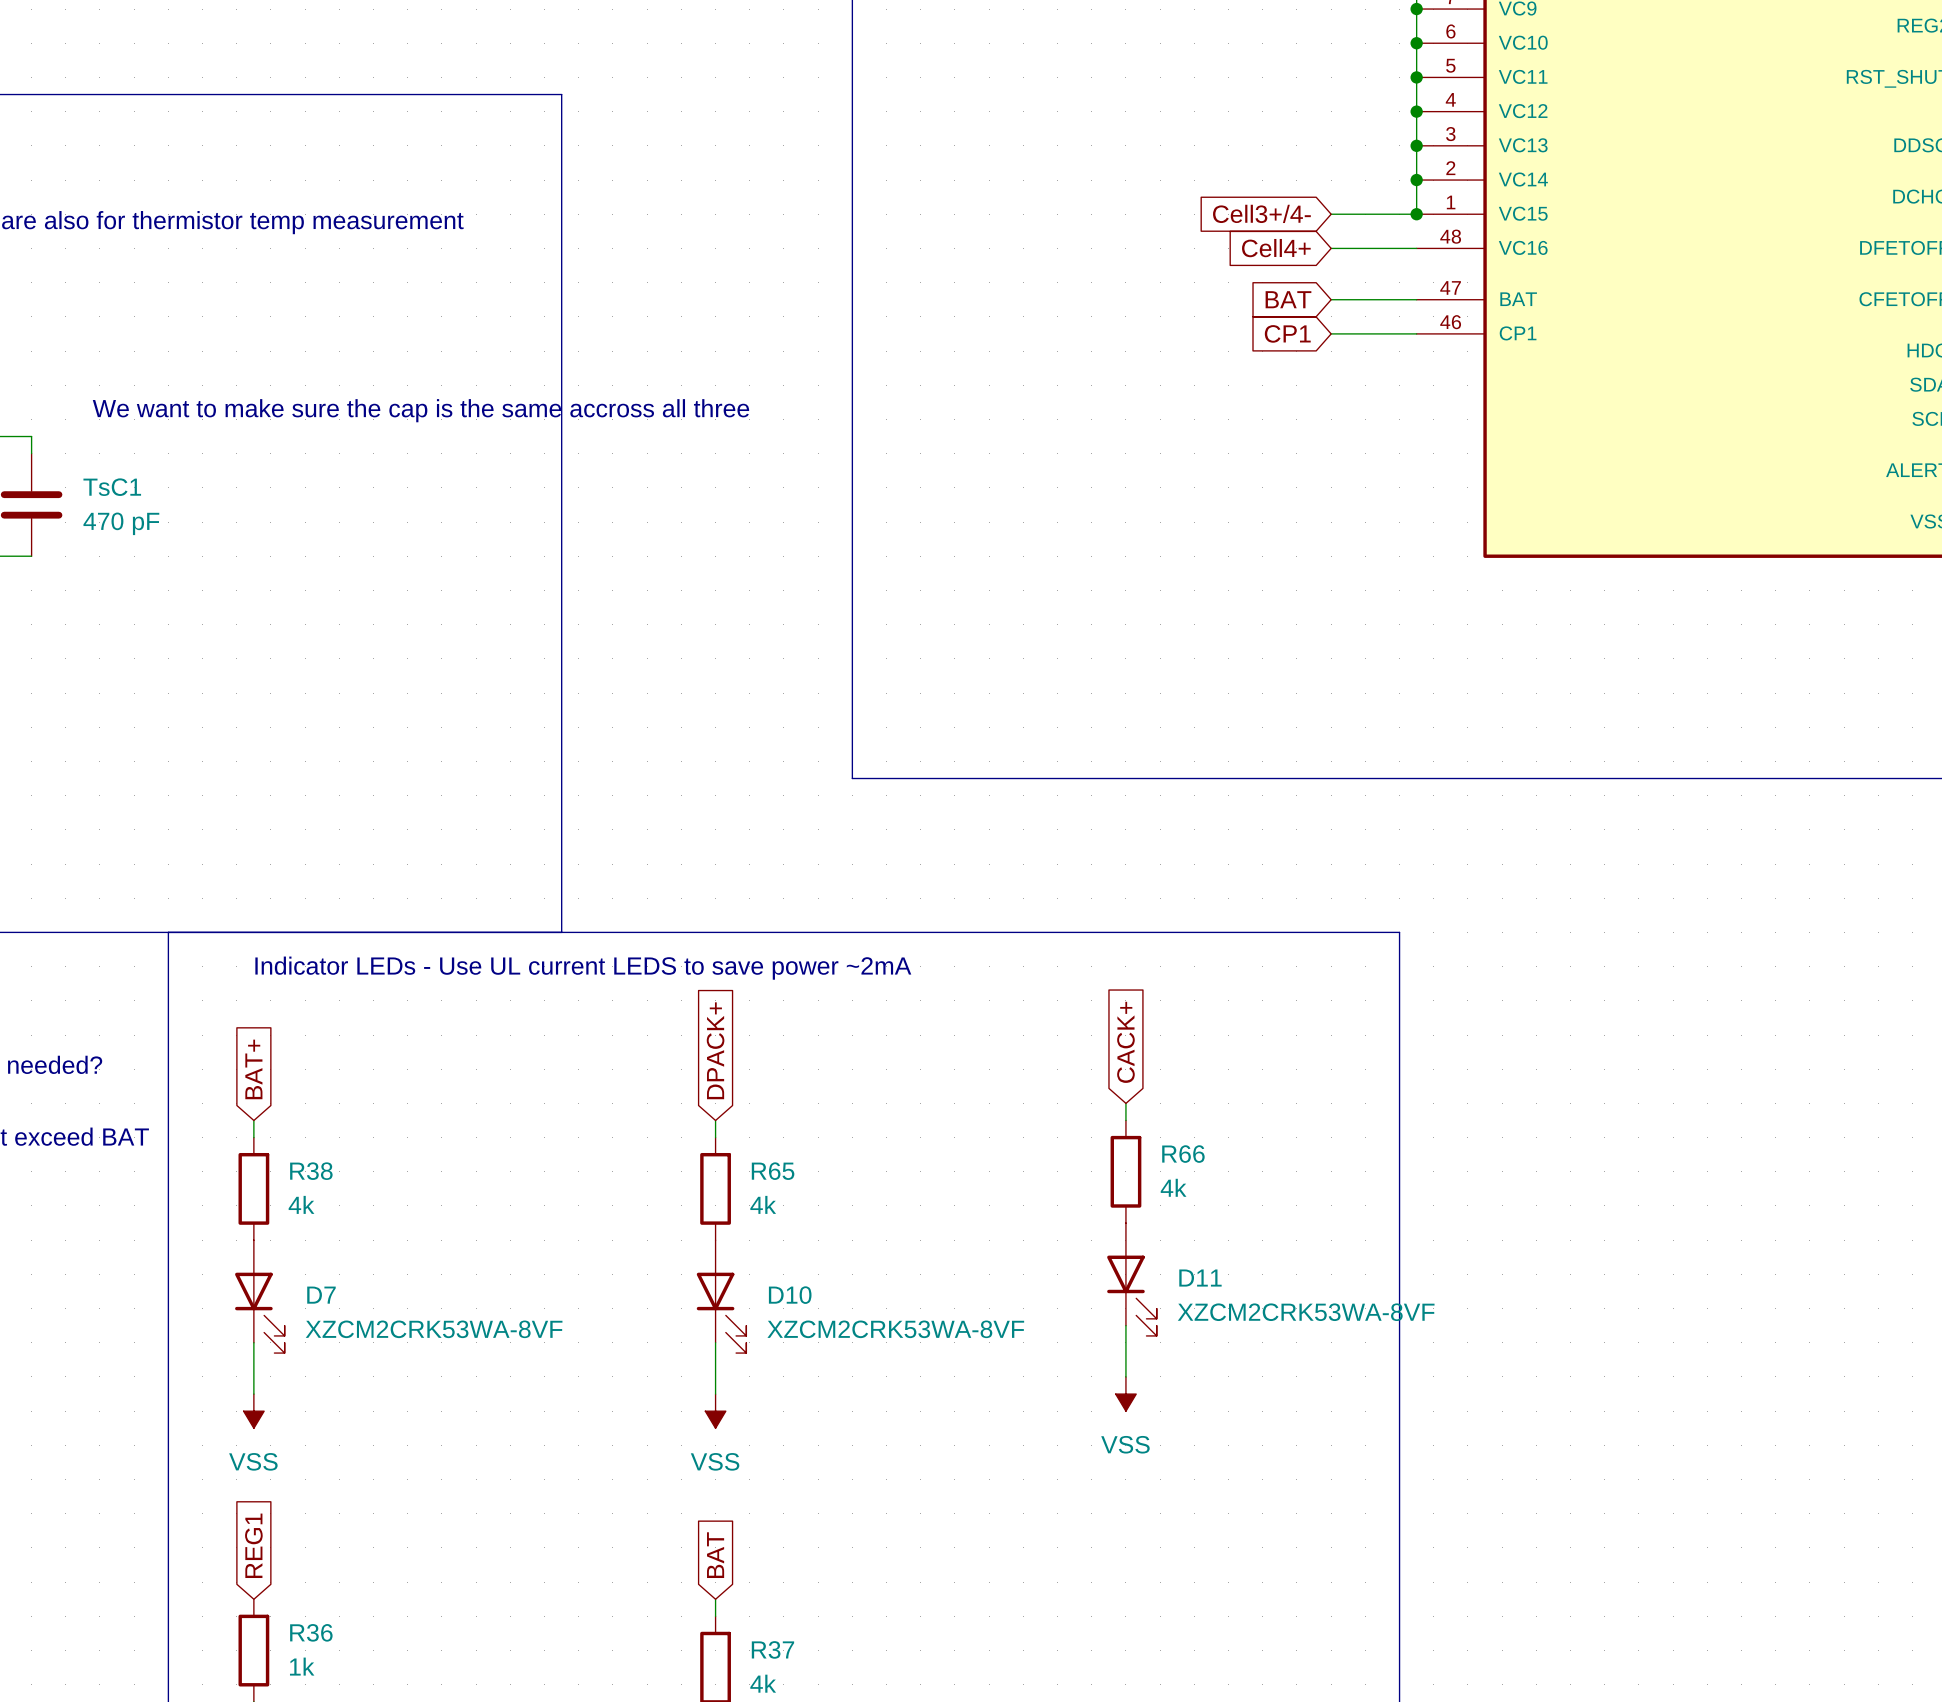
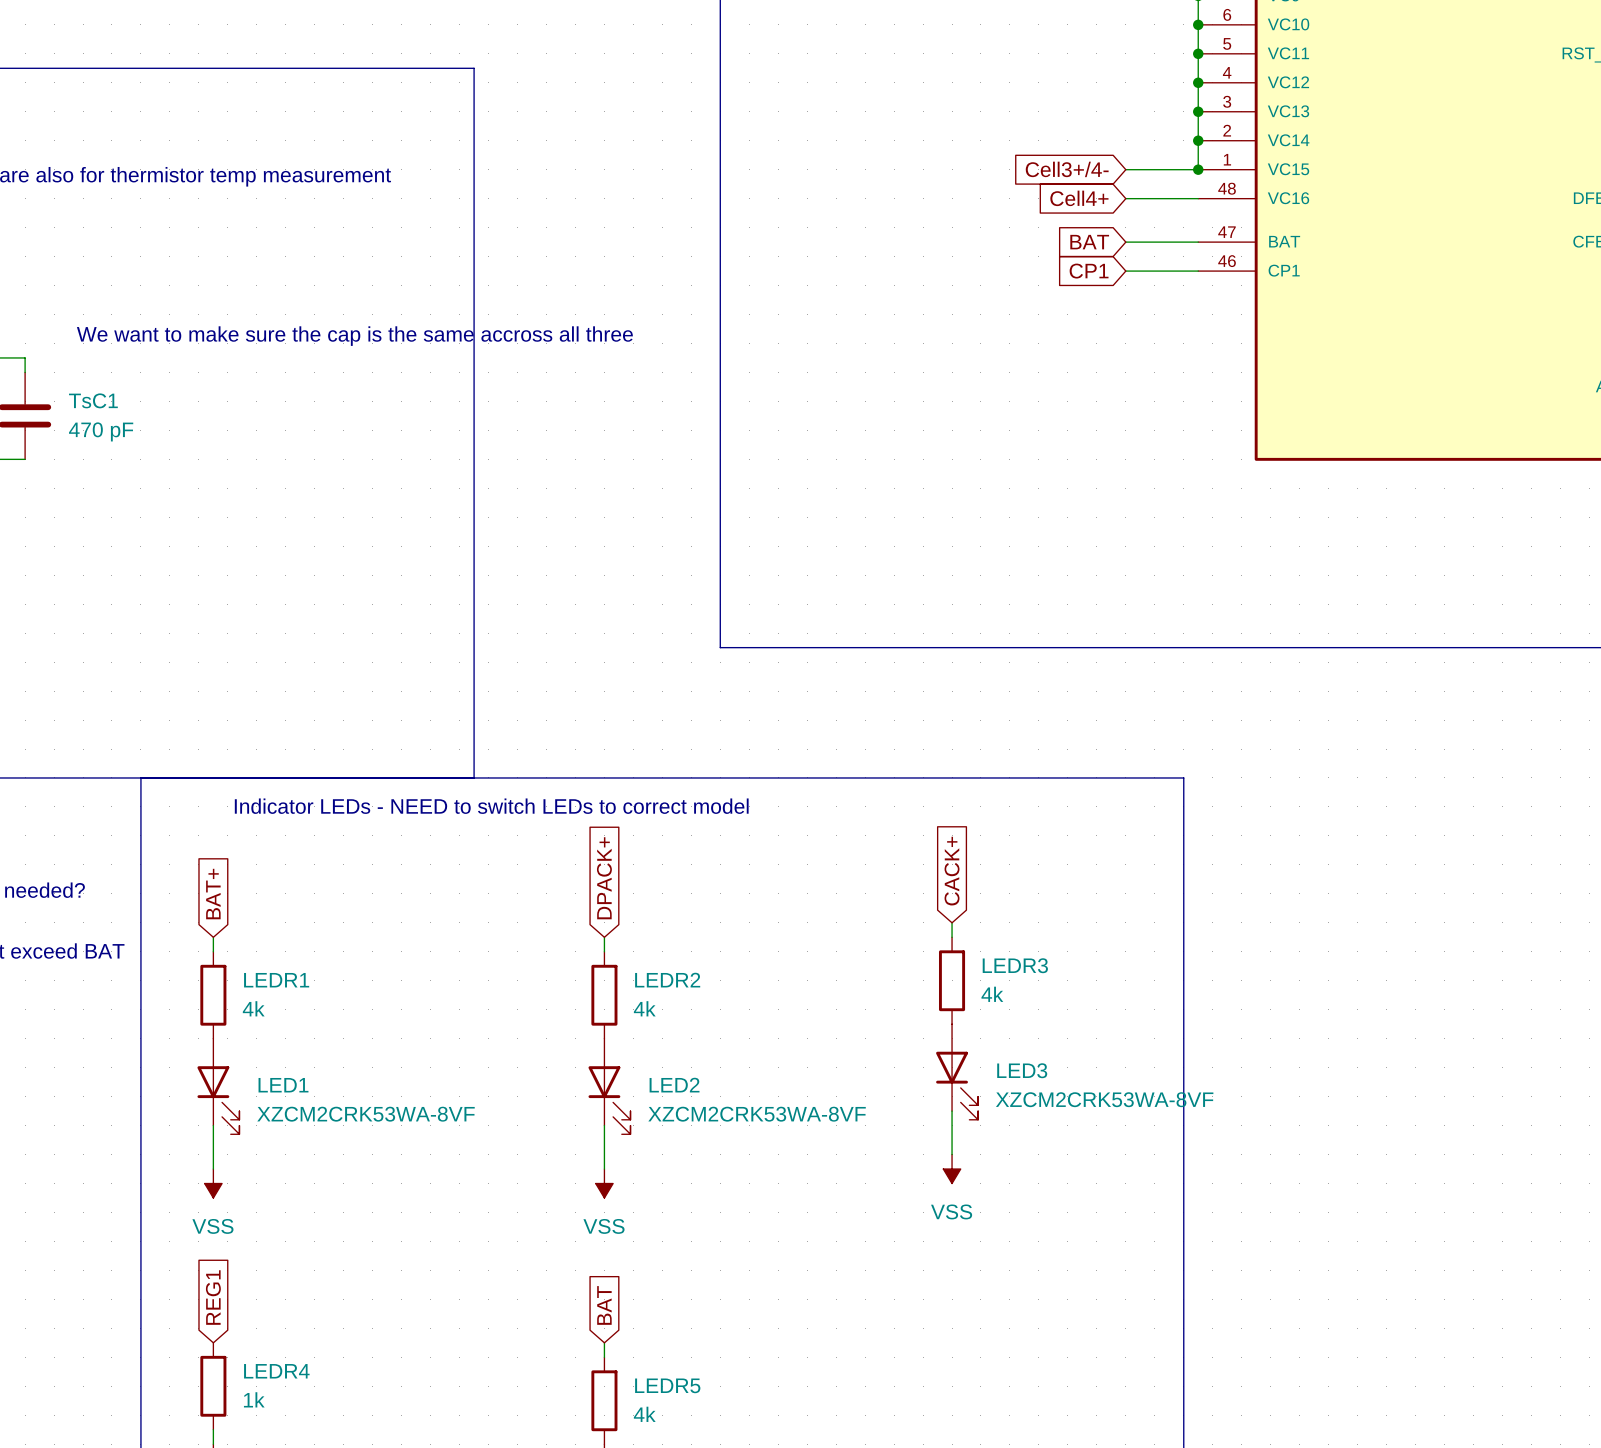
text: Indicator LEDs - Use UL current LEDS to save power ~2mA (583, 968) -> Indicator LEDs - NEED to switch LEDs to correct model (491, 806)
R66 name: R66 (1183, 1154) -> LEDR3 (1015, 965)
R38 name: R38 (311, 1171) -> LEDR1 (276, 980)
R65 name: R65 (773, 1171) -> LEDR2 (667, 980)
D11 name: D11 (1200, 1278) -> LED3 (1022, 1070)
D7 name: D7 (321, 1295) -> LED1 (283, 1085)
D10 name: D10 (790, 1295) -> LED2 (674, 1085)
R36 name: R36 (311, 1632) -> LEDR4 (276, 1371)
R37 name: R37 (772, 1649) -> LEDR5 (667, 1385)

